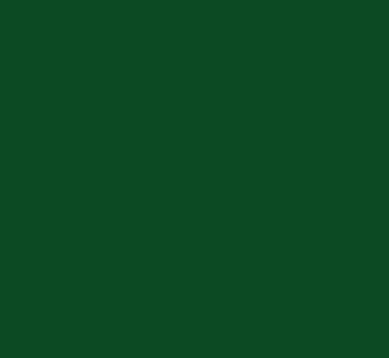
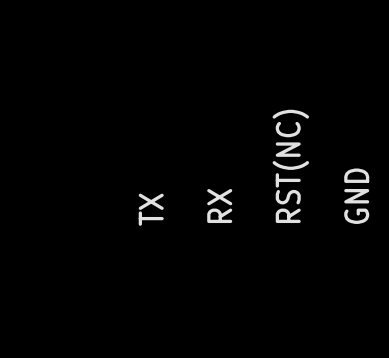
text: none -> RST(NC) (290, 166)
text: none -> GND (356, 196)
text: none -> RX (219, 206)
text: none -> TX (151, 209)

